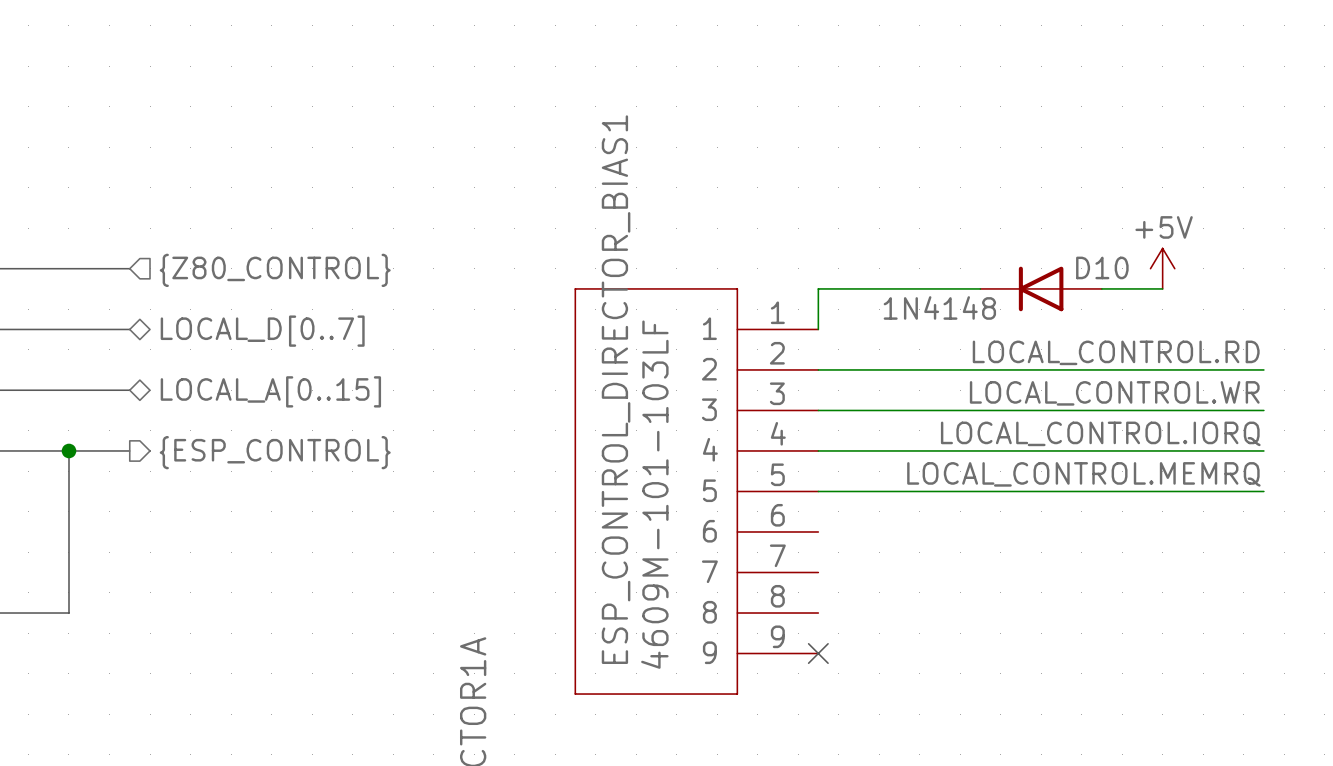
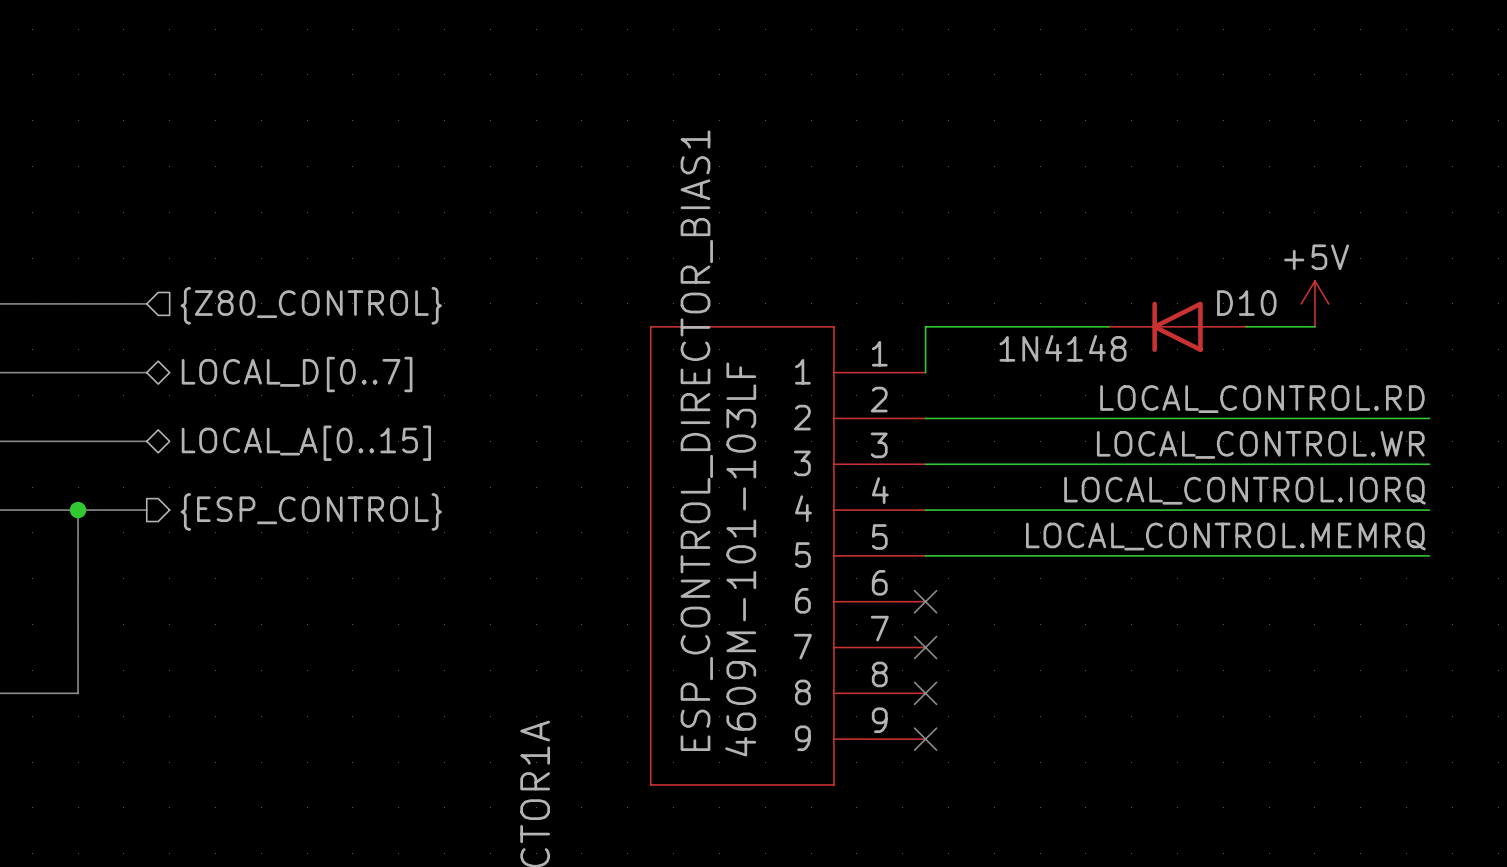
no-connect mark: none -> (925, 601)
no-connect mark: none -> (925, 647)
no-connect mark: none -> (925, 693)

